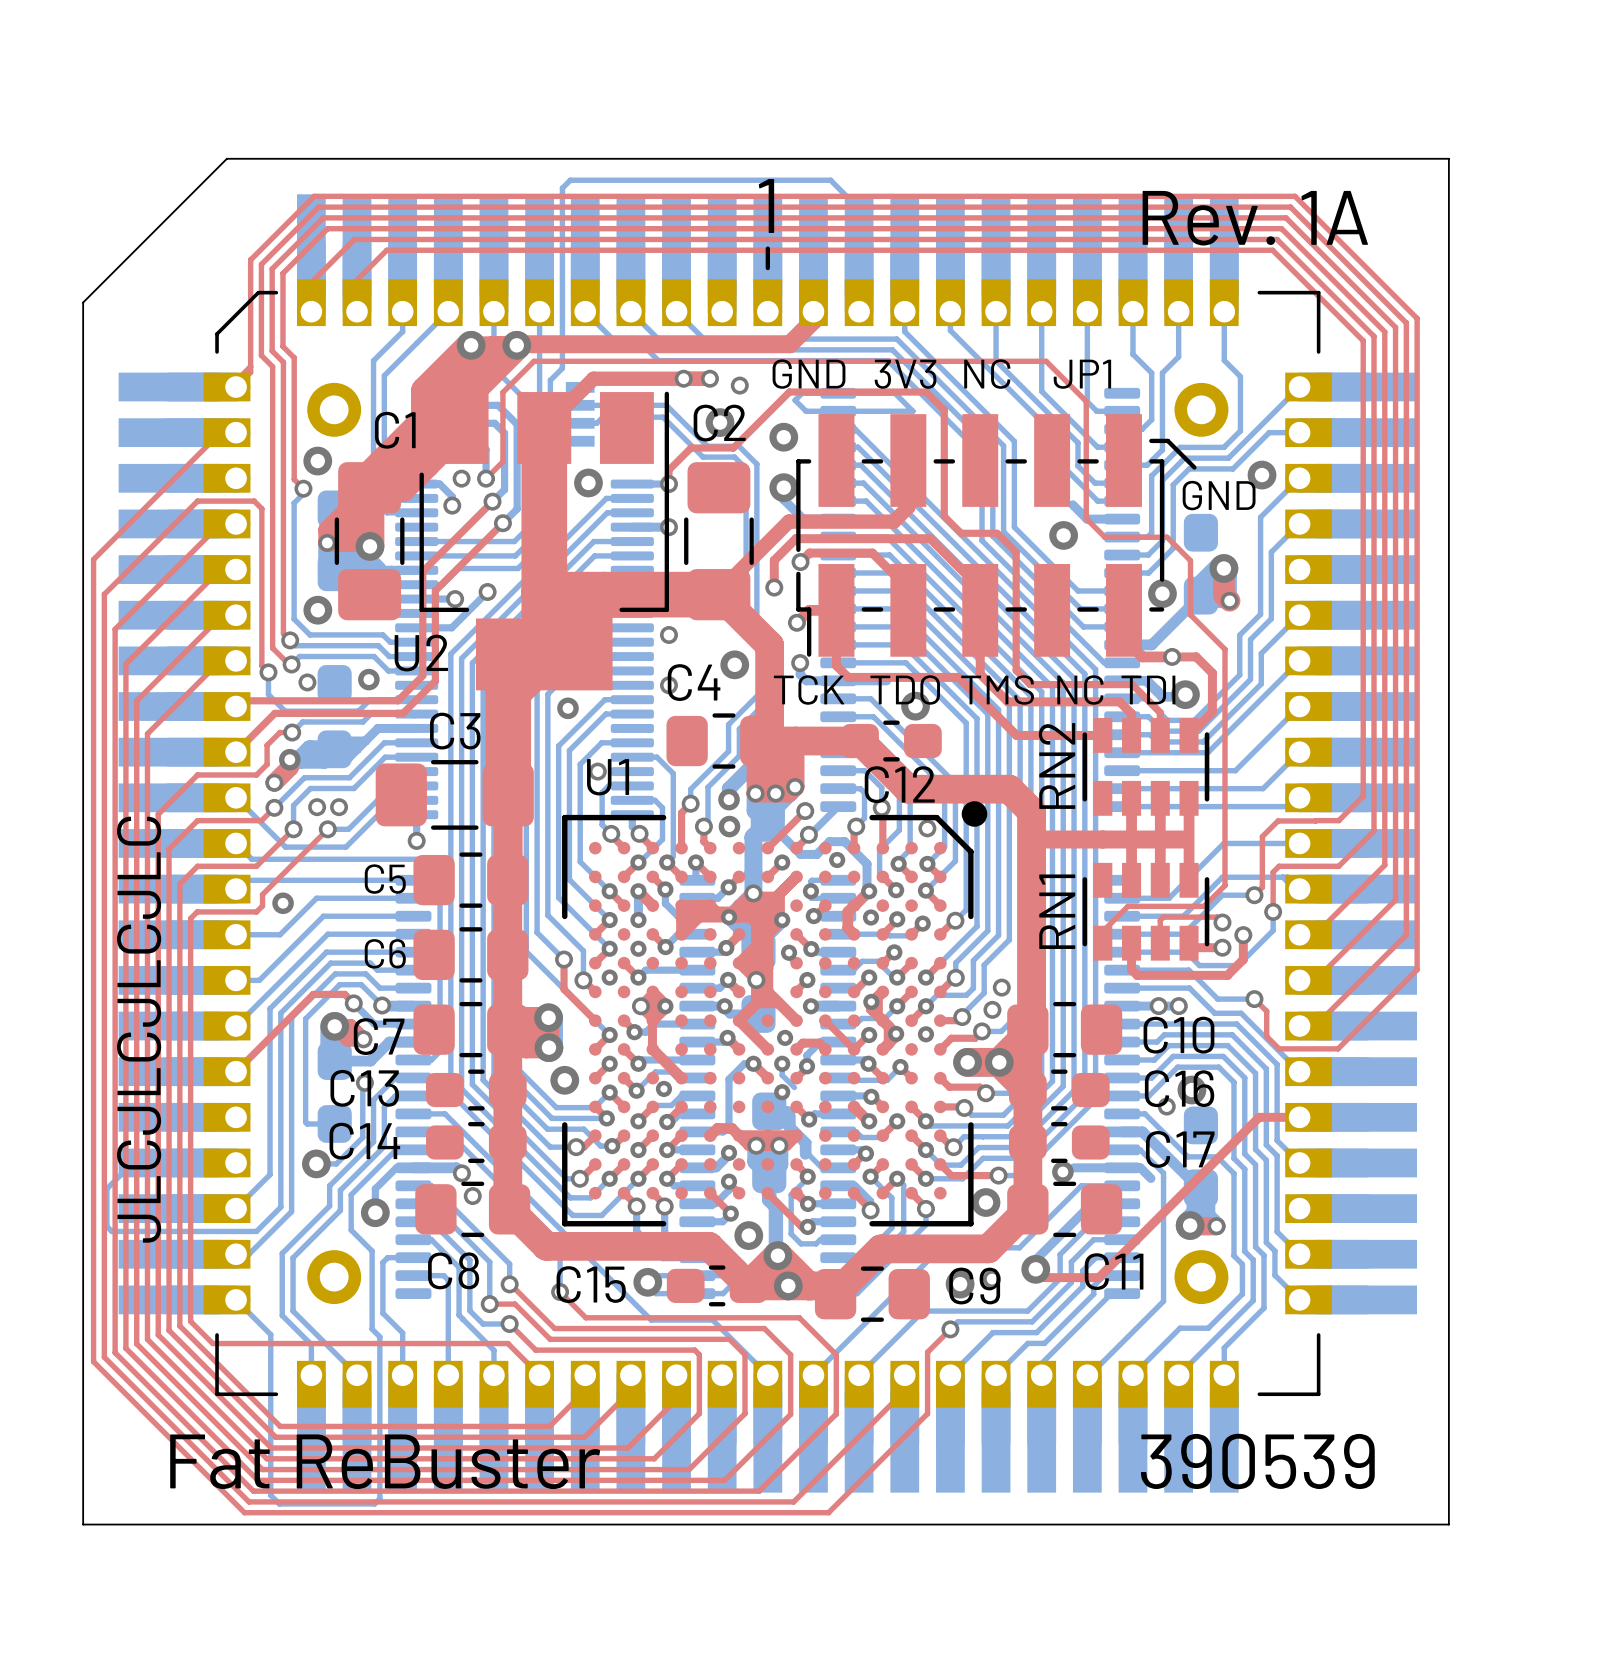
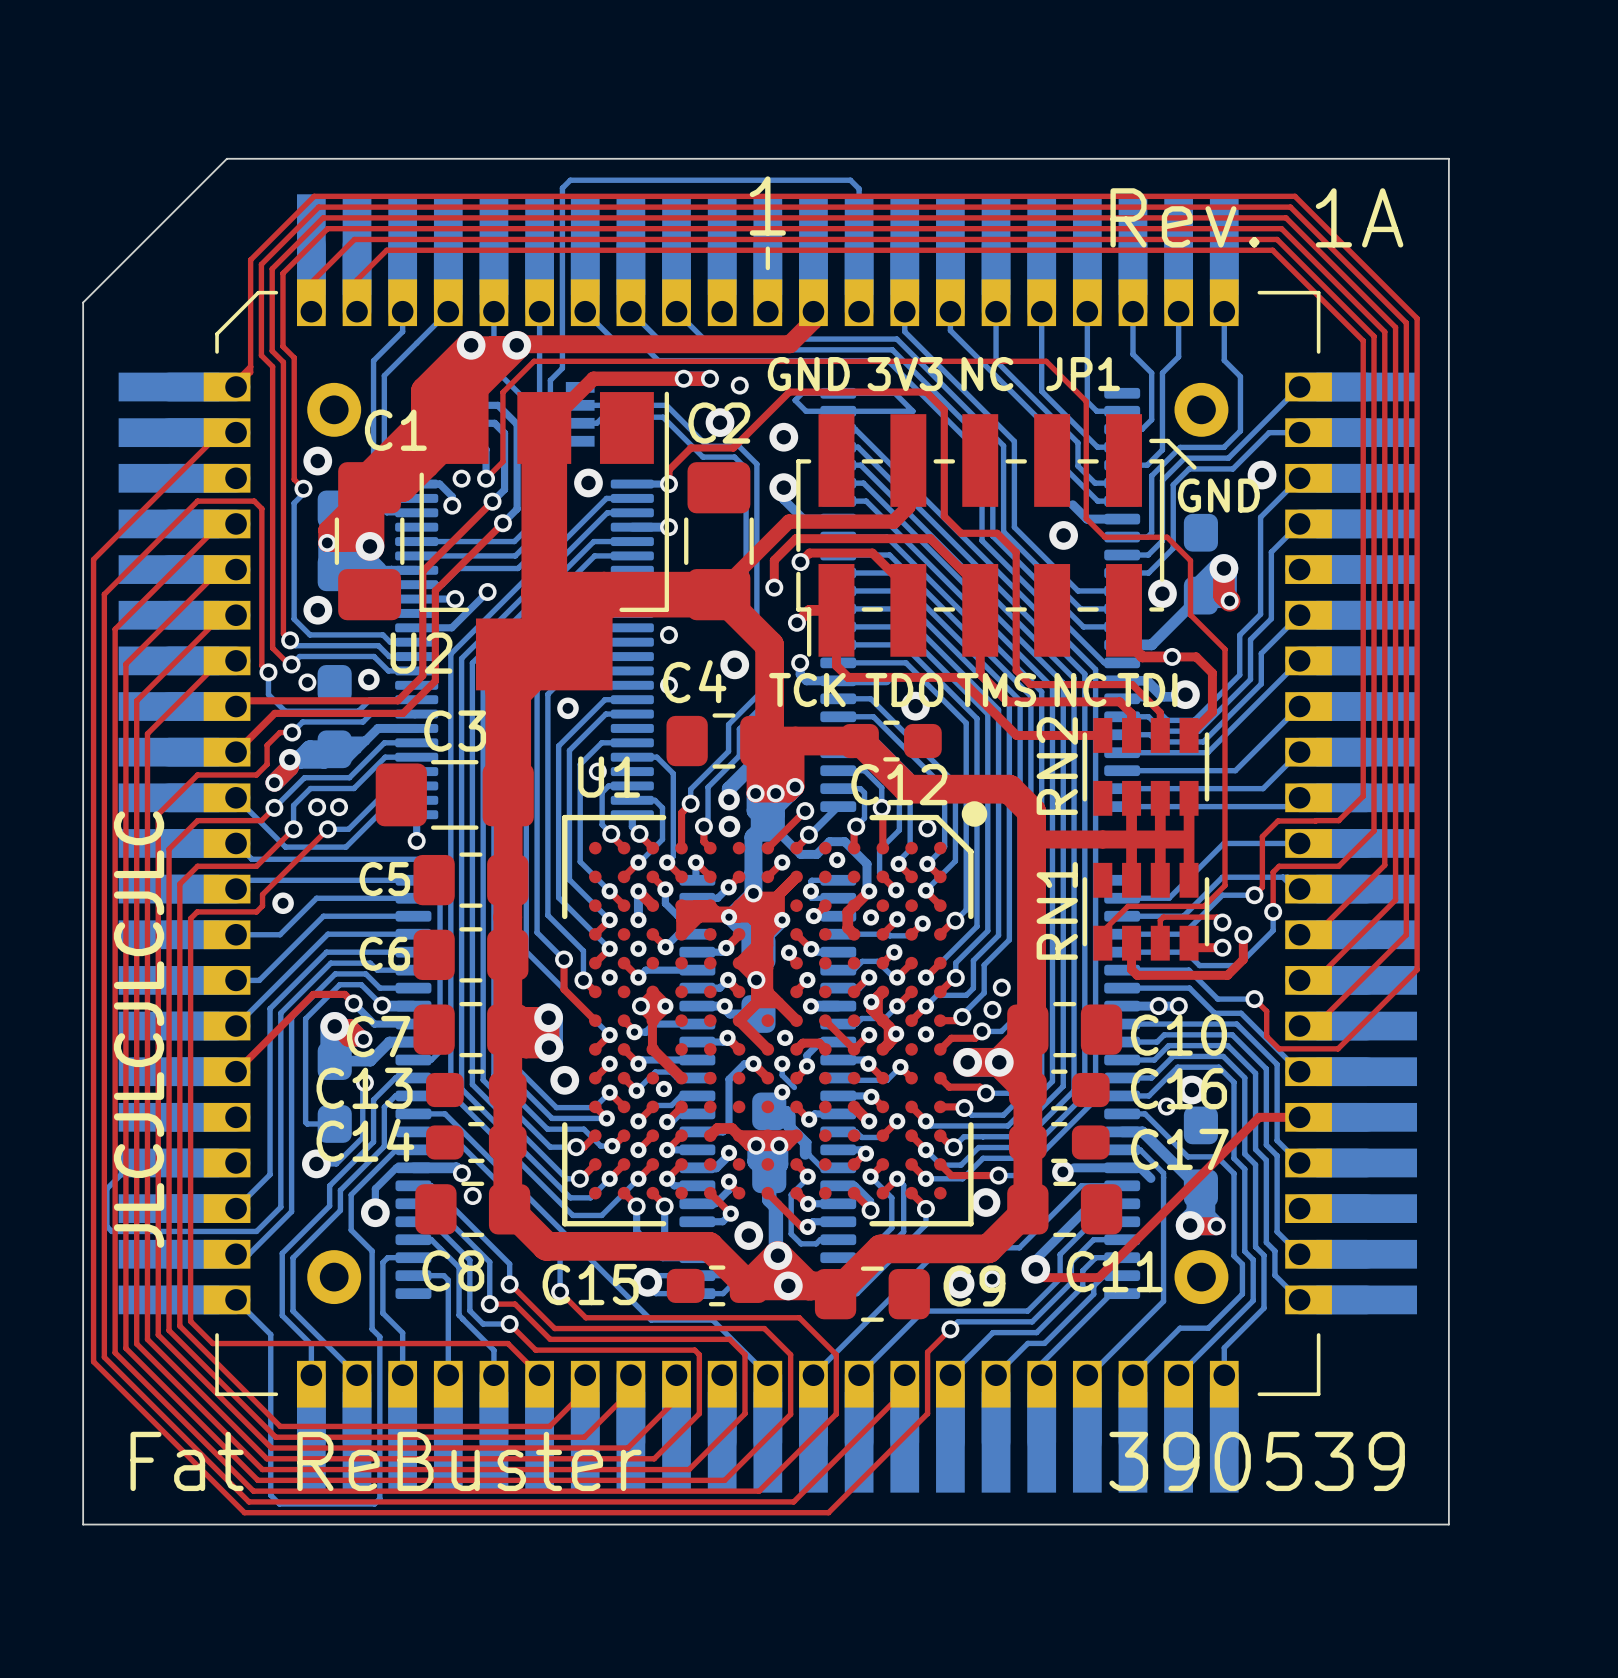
bottom track: (830, 180) (859, 208) -> (830, 180) (850, 180) (859, 188) (859, 208)

